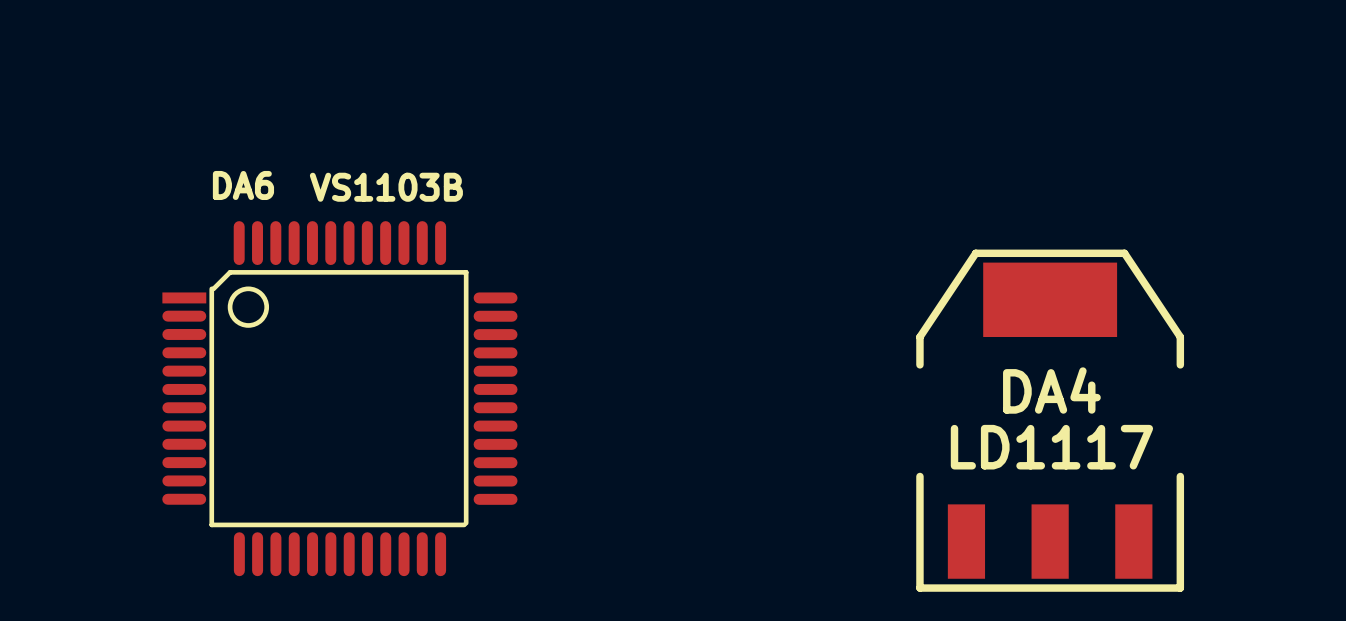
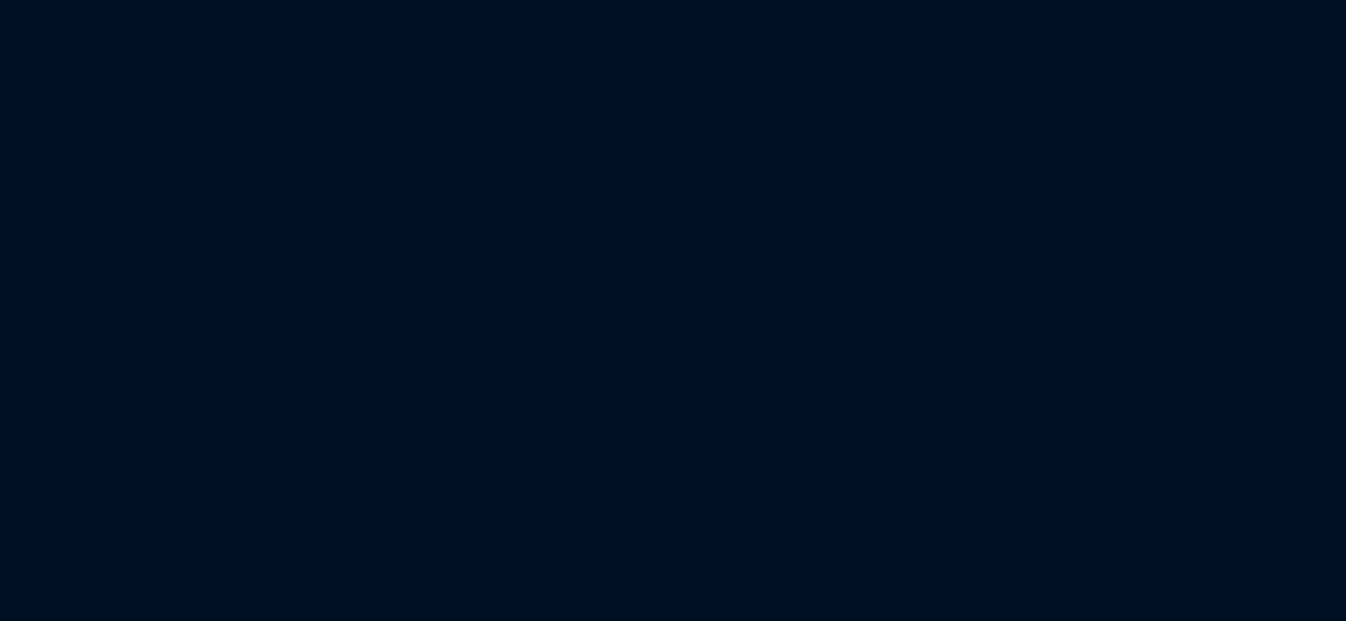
DA6: VS1103B (339, 398) -> none
DA4: LD1117 (1050, 420) -> none

